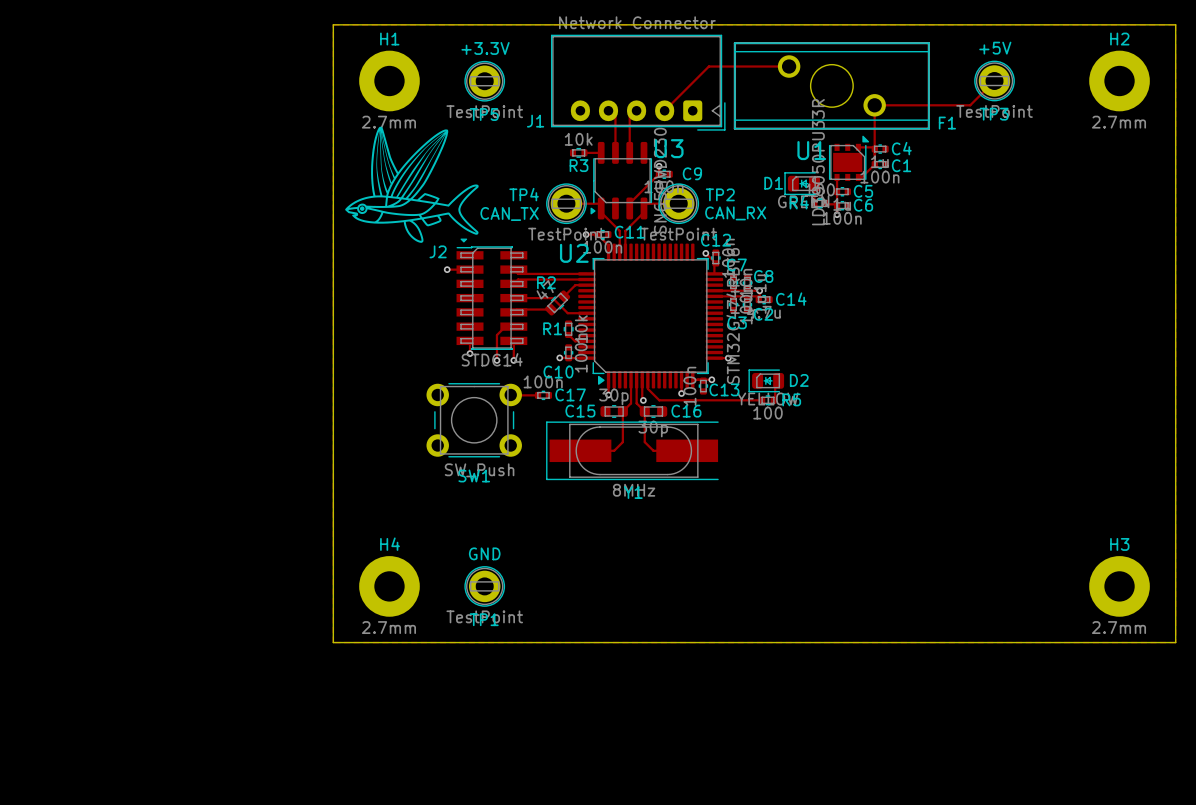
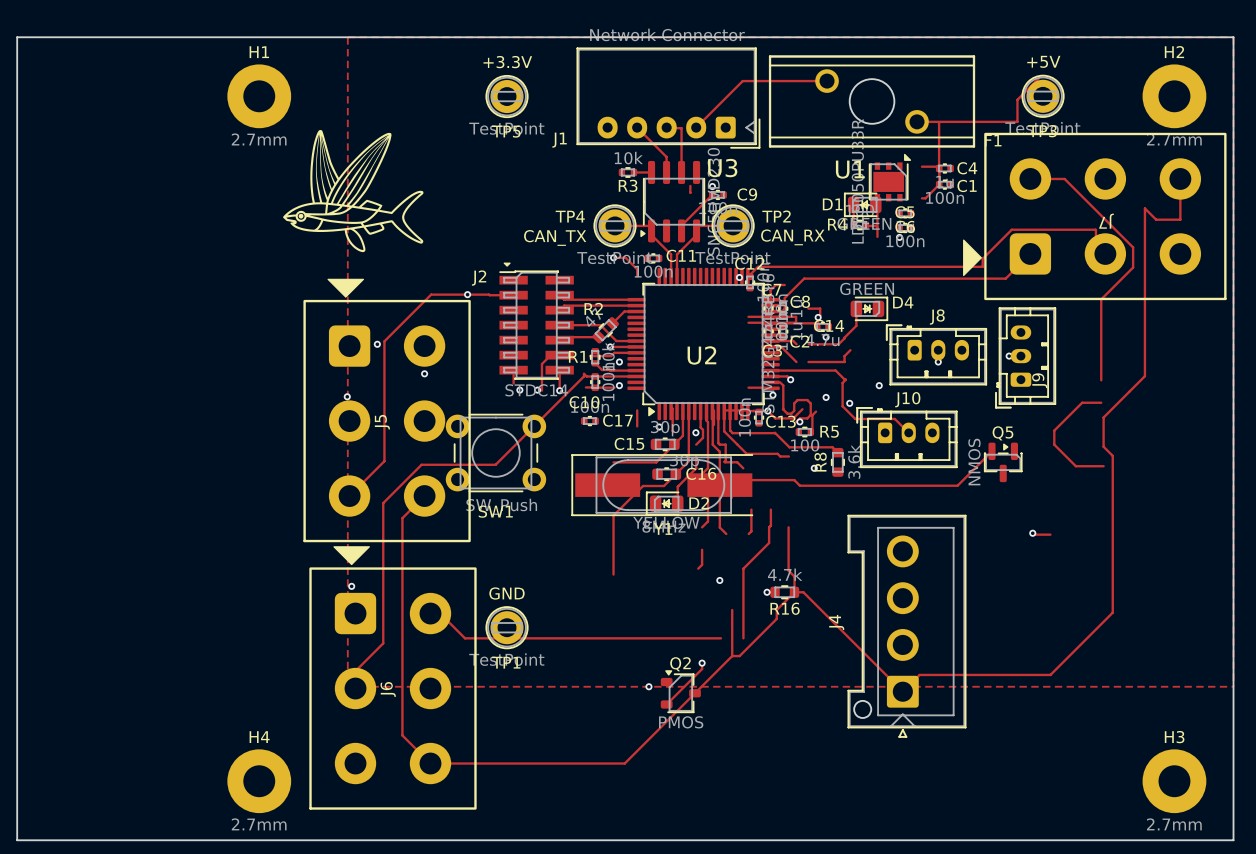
board edge: (333, 24) (333, 642) (1175, 642) -> (347, 37) (17, 37) (17, 840) (1233, 840) (1233, 686)
H1 position: (389, 81) -> (259, 96)
track: (994, 81) (970, 105) -> (1038, 78) (1017, 99) (1017, 121)
track: (874, 105) (874, 154) -> (939, 122) (939, 174)
track: none -> (669, 124) (673, 128) (681, 128) (681, 172)
track: none -> (637, 127) (666, 157) (666, 172)
track: (615, 110) (615, 152) -> none
track: (629, 110) (629, 152) -> none
track: (858, 147) (873, 147) (874, 149) (874, 164) (861, 177) (858, 177) -> (921, 166) (937, 166) (939, 168) (939, 184) (925, 198) (921, 198)
C4 position: (880, 149) -> (944, 168)
R3 position: (578, 152) -> (627, 172)
track: (584, 152) (601, 152) -> (633, 172) (651, 172)
track: none -> (1030, 178) (1064, 178) (1133, 247) (1133, 267) (1101, 299) (1101, 380)
track: none -> (1180, 178) (1180, 219) (1156, 219) (1144, 208) (1144, 376) (1103, 417) (1103, 446) (1112, 455) (1112, 612) (1050, 674) (919, 674) (902, 691) (803, 592) (794, 592)
C1 position: (880, 164) -> (944, 184)
via position: (659, 166) -> (712, 186)
track: (658, 174) (629, 203) (629, 208) -> (712, 194) (681, 225) (681, 230)
C9 position: (664, 174) -> (717, 194)
U3 position: (621, 180) -> (672, 201)
D1 position: (802, 183) -> (862, 204)
drawing position: (411, 184) -> (353, 191)
C5 position: (842, 191) -> (905, 213)
J7: none -> (1094, 216)
track: (566, 203) (601, 203) (601, 212) (619, 230) (619, 252) -> (615, 225) (651, 225) (651, 235) (671, 254) (671, 276)
TP4 position: (566, 203) -> (615, 225)
track: (678, 203) (643, 203) (643, 212) (625, 230) (625, 252) -> (733, 225) (696, 225) (696, 235) (677, 254) (677, 276)
TP2 position: (678, 203) -> (733, 225)
C6 position: (842, 205) -> (905, 227)
drawing position: (362, 208) -> (301, 216)
via position: (837, 214) -> (899, 237)
track: none -> (1030, 253) (1005, 278) (804, 278) (784, 298) (784, 308) (782, 311) (770, 311)
C11 position: (602, 234) -> (653, 258)
track: none -> (1095, 270) (1095, 229) (1011, 229) (982, 258) (982, 266) (758, 266) (747, 276)
U2 name position: U2 (574, 253) -> U2 (701, 355)
track: (705, 253) (715, 263) (714, 273) -> none
track: none -> (784, 285) (775, 285) (770, 290) (770, 299)
track: none -> (467, 294) (431, 294) (384, 341) (384, 461) (349, 496)
track: none -> (484, 294) (506, 295)
track: (513, 269) (518, 273) (586, 273) -> (559, 295) (564, 299) (636, 299)
track: (586, 279) (518, 279) (513, 283) -> (636, 305) (564, 305) (559, 310)
track: none -> (808, 308) (820, 308) (818, 323) (770, 323)
track: none -> (856, 308) (856, 325) (844, 338)
D4: none -> GREEN (869, 308)
track: (586, 285) (575, 285) (564, 296) -> (636, 311) (624, 311) (612, 323)
via: (759, 290) -> none
via: none -> (818, 317)
J2 position: (491, 294) -> (536, 321)
track: (513, 298) (552, 298) (567, 313) (586, 313) -> (559, 325) (600, 325) (616, 341) (636, 341)
C14 position: (764, 299) -> (822, 326)
R2 position: (557, 302) -> (605, 330)
track: (551, 309) (516, 309) (513, 312) -> (598, 337) (562, 337) (559, 340)
via: none -> (826, 337)
track: none -> (844, 338) (838, 344) (808, 344)
track: none -> (770, 341) (793, 341) (796, 344)
via: none -> (377, 344)
U2 position: (650, 316) -> (703, 344)
track: none -> (610, 346) (636, 346)
via: none -> (610, 346)
track: none -> (770, 346) (781, 346) (796, 362)
track: none -> (850, 350) (844, 356) (844, 362) (808, 362)
track: none -> (636, 352) (614, 352) (611, 356) (589, 356)
track: (513, 326) (505, 326) (496, 335) (496, 360) -> (559, 355) (550, 355) (541, 364) (541, 390)
J8: none -> (936, 354)
via: none -> (1009, 356)
J9: none -> (1025, 357)
via: none -> (619, 362)
via: none -> (938, 362)
track: none -> (607, 367) (610, 370) (636, 370)
track: (470, 340) (470, 353) -> (513, 370) (513, 383)
track: (513, 340) (513, 360) -> (559, 370) (559, 390)
track: none -> (770, 370) (835, 370) (845, 379) (842, 382) (842, 406) (855, 418) (894, 418) (908, 432)
via: none -> (424, 373)
track: none -> (636, 376) (586, 376) (584, 373) (584, 376) (495, 464) (421, 464) (383, 503) (383, 643) (351, 674)
track: none -> (770, 376) (787, 376) (790, 379)
via: none -> (790, 379)
via: (470, 353) -> none
track: none -> (780, 382) (783, 385) (782, 409) (787, 413) (791, 413) (794, 410) (794, 403) (797, 400) (807, 400) (810, 403) (810, 415) (807, 418) (800, 418) (796, 421) (799, 421)
via: none -> (619, 385)
via: none -> (879, 385)
via: (559, 357) -> none
via: (728, 358) -> none
via: none -> (559, 390)
via: none -> (772, 395)
via: none -> (347, 396)
via: none -> (826, 397)
track: none -> (1101, 402) (1082, 402) (1054, 430) (1054, 444) (1075, 466) (1103, 466)
via: none -> (849, 403)
track: none -> (802, 409) (793, 418) (775, 418) (767, 411) (747, 411)
J5: none -> (387, 410)
track: (631, 379) (631, 403) (622, 411) (622, 442) (614, 450) (580, 450) -> none
track: (636, 379) (636, 403) (644, 411) (644, 442) (653, 450) (687, 450) -> none
track: (647, 379) (647, 388) (659, 400) (762, 400) -> none
via: (711, 379) -> none
track: none -> (682, 411) (682, 435) (656, 462) (613, 462)
track: none -> (688, 411) (688, 461) (664, 486) (643, 486) (613, 515) (613, 574)
track: none -> (700, 411) (703, 437) (696, 444)
track: none -> (706, 411) (708, 468) (696, 479)
track: none -> (712, 411) (712, 444) (719, 451) (719, 479) (731, 491) (731, 497)
track: none -> (718, 411) (718, 443) (725, 444) (724, 461) (737, 462) (743, 468)
track: none -> (724, 411) (724, 431) (746, 453) (777, 453) (780, 456) (788, 456)
track: none -> (730, 411) (730, 430) (732, 433) (775, 432) (789, 447) (832, 447) (837, 452)
via: none -> (767, 411)
D2 position: (766, 380) -> (664, 503)
C13 position: (703, 386) -> (759, 417)
via: none -> (799, 421)
via: (681, 393) -> none
track: (510, 394) (538, 395) -> none
via: (608, 394) -> none
C17 position: (543, 395) -> (589, 421)
via: none -> (659, 427)
via: (643, 400) -> none
via: none -> (695, 432)
J10: none -> (906, 437)
C15 position: (614, 411) -> (665, 444)
C16 position: (653, 411) -> (666, 474)
track: none -> (992, 451) (957, 485) (799, 485) (794, 480) (737, 480) (731, 474)
track: none -> (696, 456) (696, 468) (677, 486) (677, 503)
R8: none -> 3.6k (837, 462)
Q5: none -> NMOS (1003, 462)
via: none -> (814, 468)
track: none -> (708, 480) (708, 521) (702, 527)
track: none -> (719, 492) (719, 527) (726, 533)
track: none -> (424, 496) (402, 518) (402, 735) (430, 763) (624, 763) (732, 656)
track: none -> (751, 509) (751, 531) (748, 533)
track: none -> (770, 509) (769, 542) (743, 568) (743, 638)
track: none -> (788, 527) (788, 570) (794, 576) (794, 592)
track: none -> (1032, 533) (1050, 534)
via: none -> (1032, 533)
track: none -> (702, 549) (702, 564) (698, 568)
via: none -> (719, 580)
via: none -> (351, 586)
via: none -> (767, 592)
R16: none -> 4.7k (784, 592)
track: none -> (794, 592) (776, 610) (776, 618) (739, 656) (732, 656)
track: none -> (426, 599) (465, 638) (720, 638)
track: none -> (732, 610) (732, 656)
J4: none -> (906, 626)
H4 position: (389, 586) -> (259, 781)
H3 position: (1119, 586) -> (1174, 781)
track: none -> (702, 663) (702, 669) (666, 704)
via: none -> (702, 663)
J6: none -> (393, 677)
via: none -> (648, 686)
Q2: none -> PMOS (680, 691)

